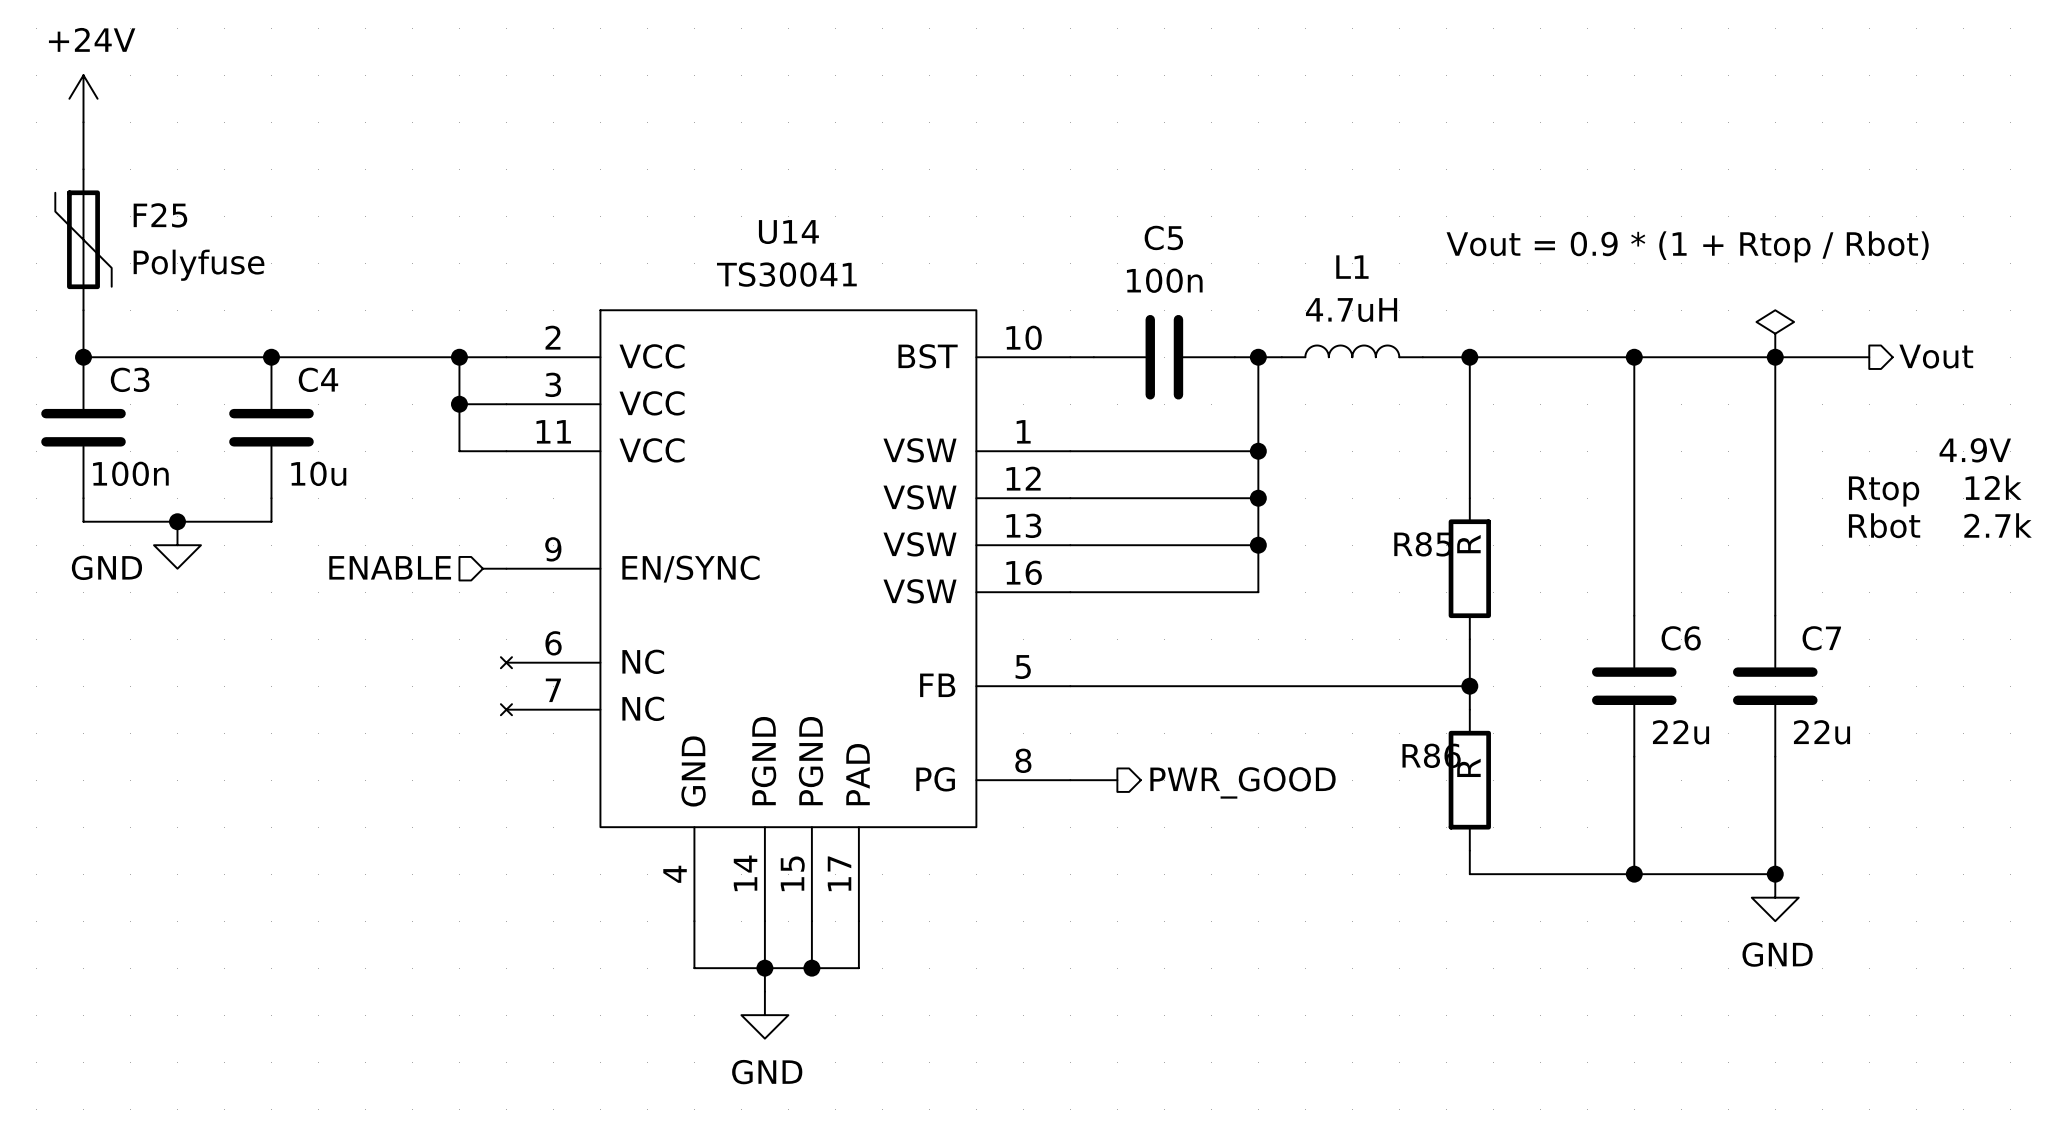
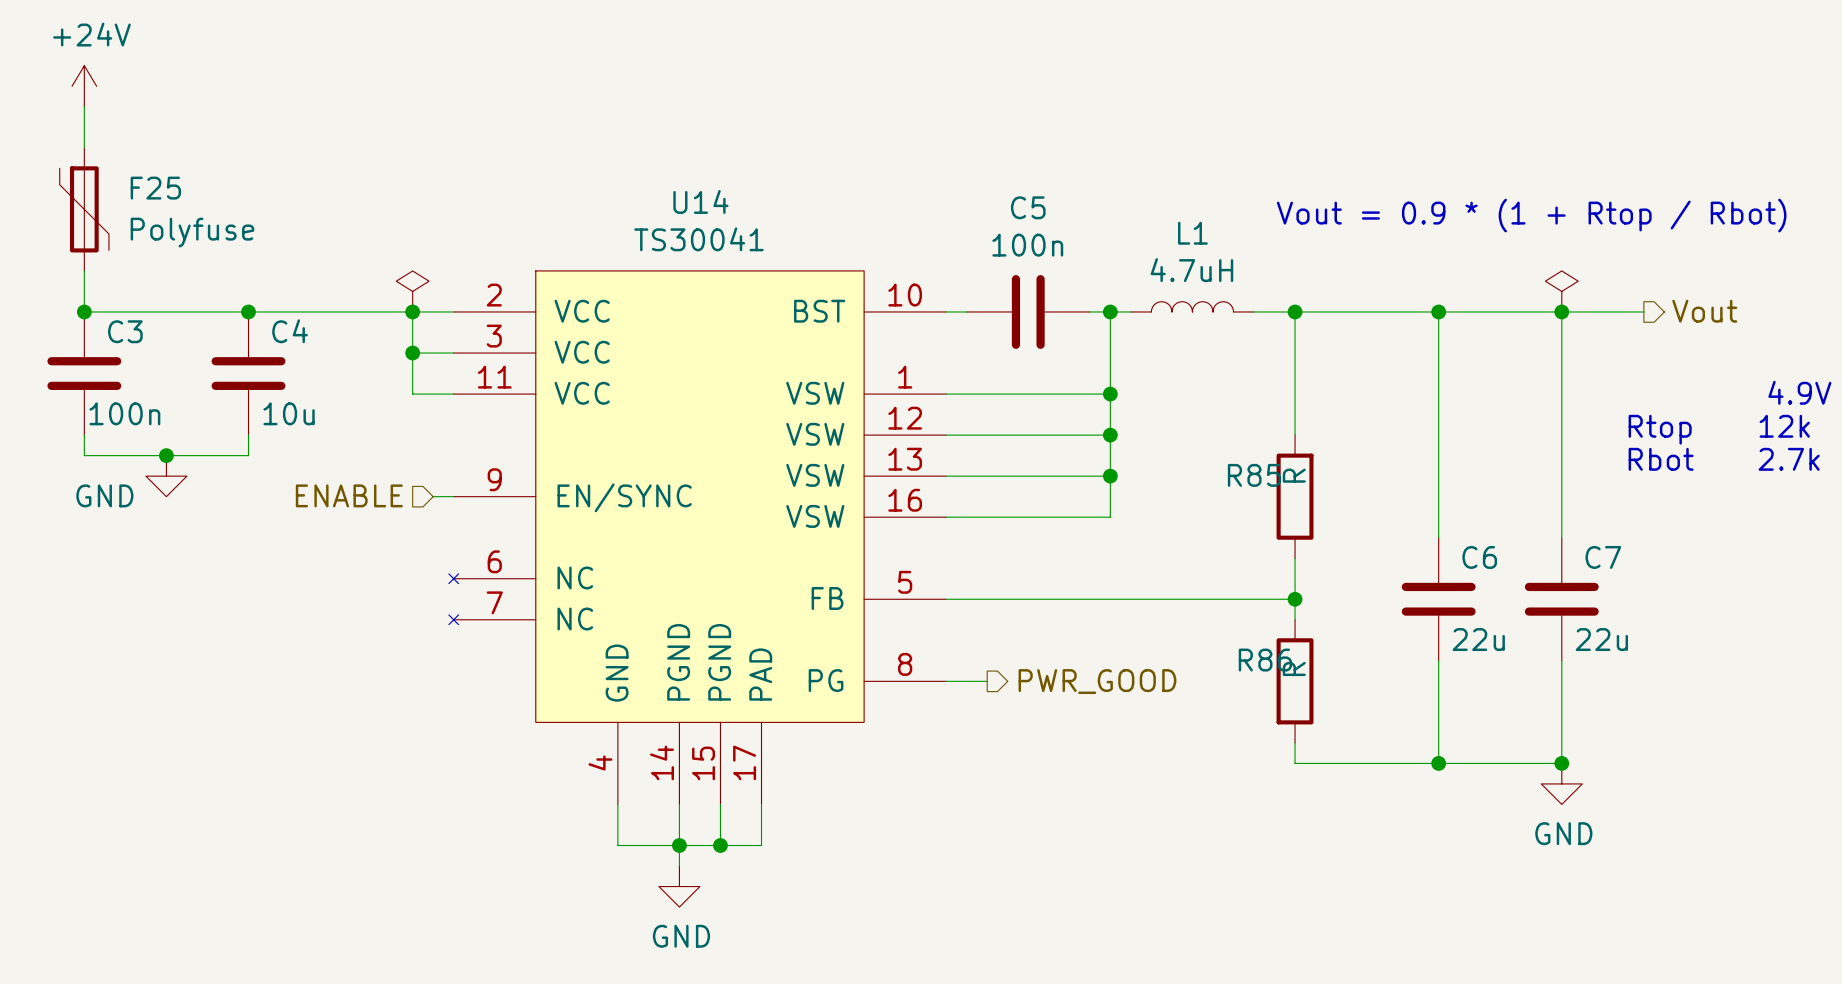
power symbol: none -> (412, 291)

